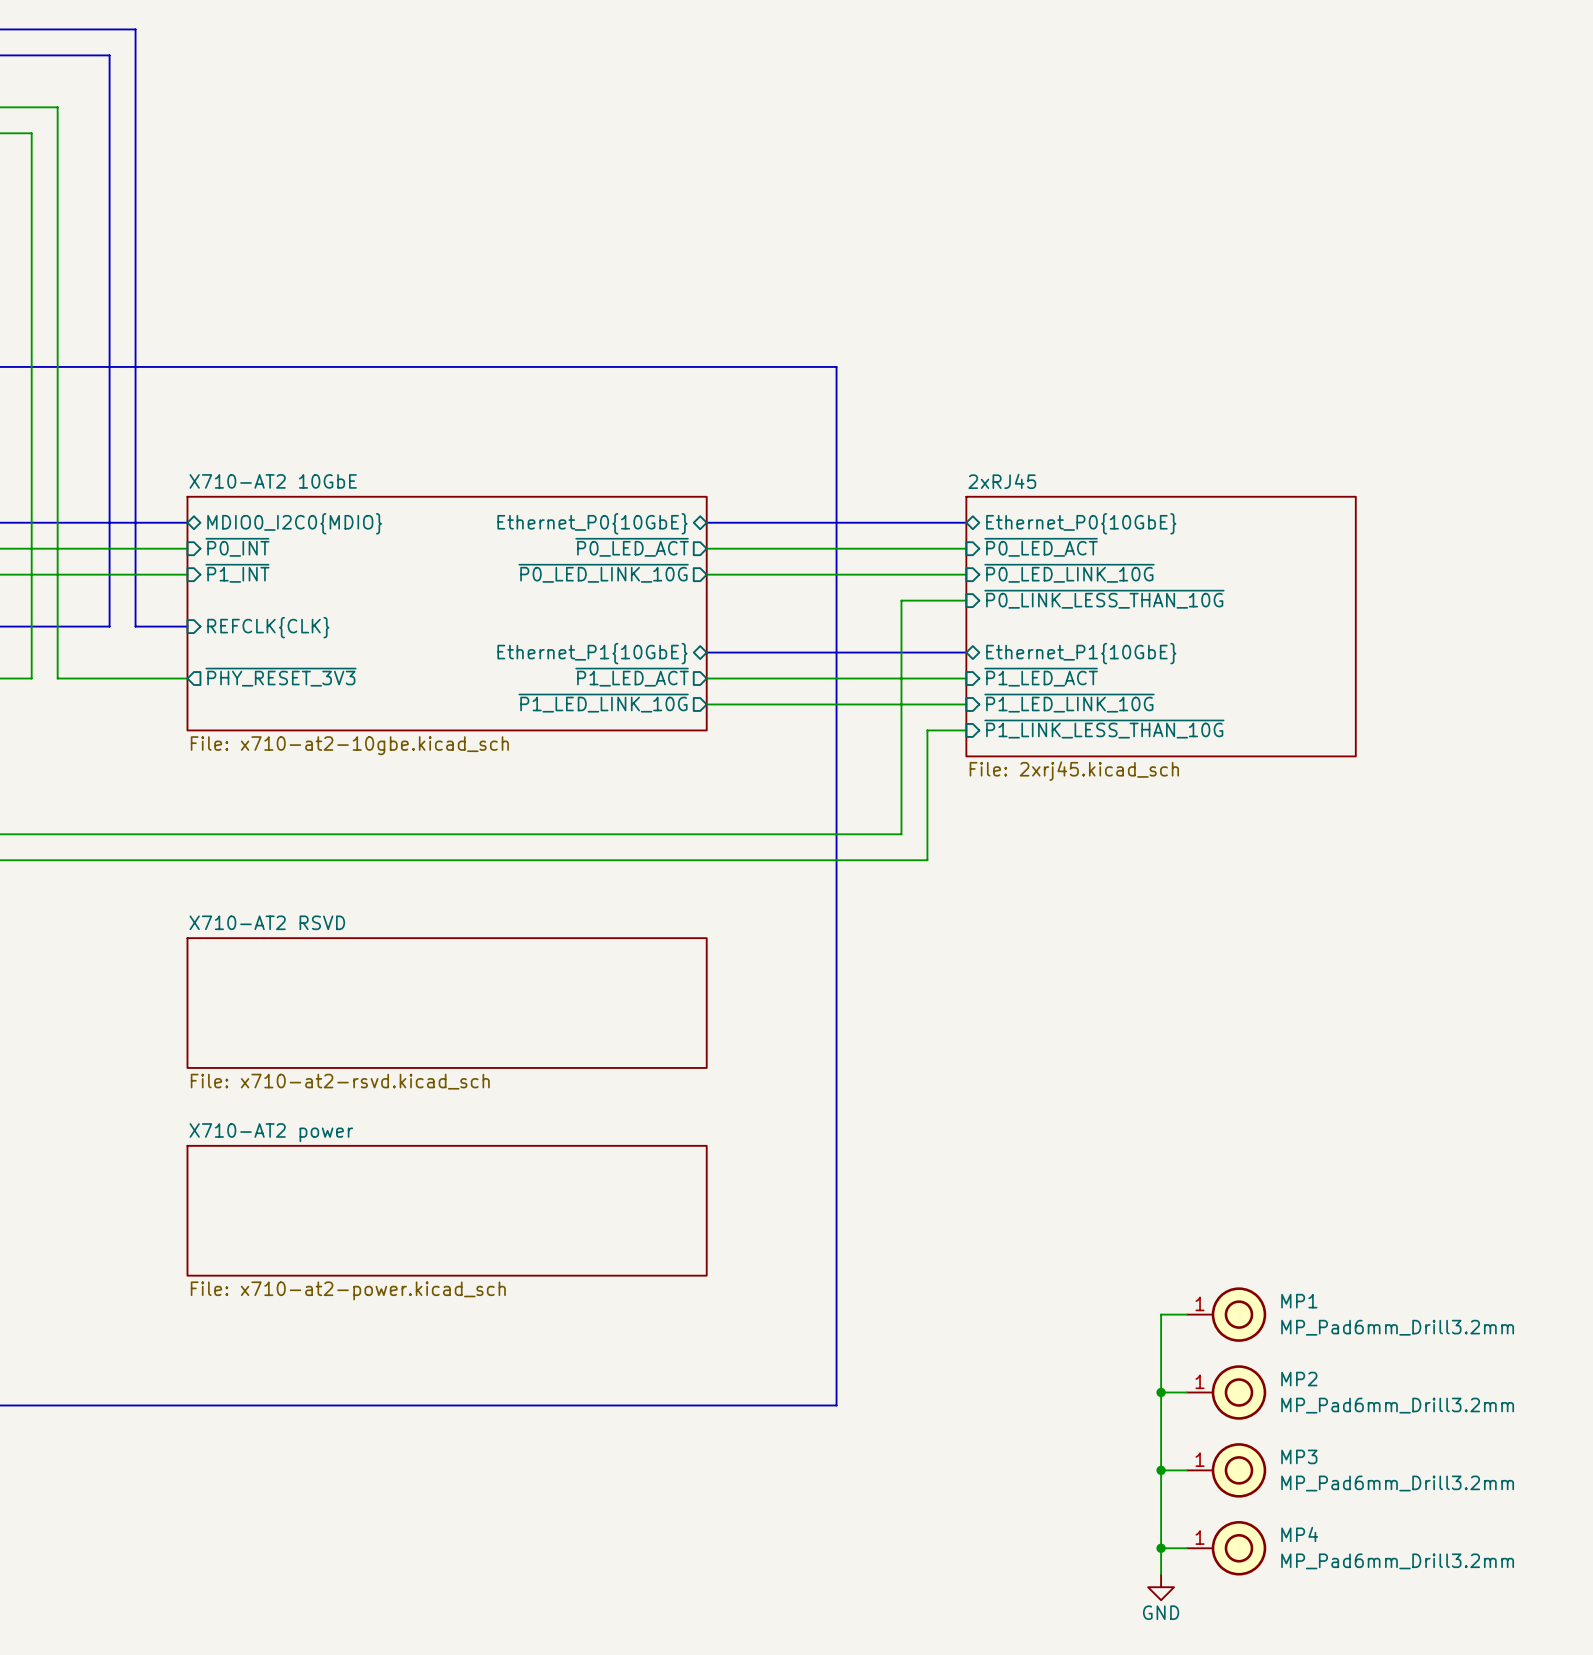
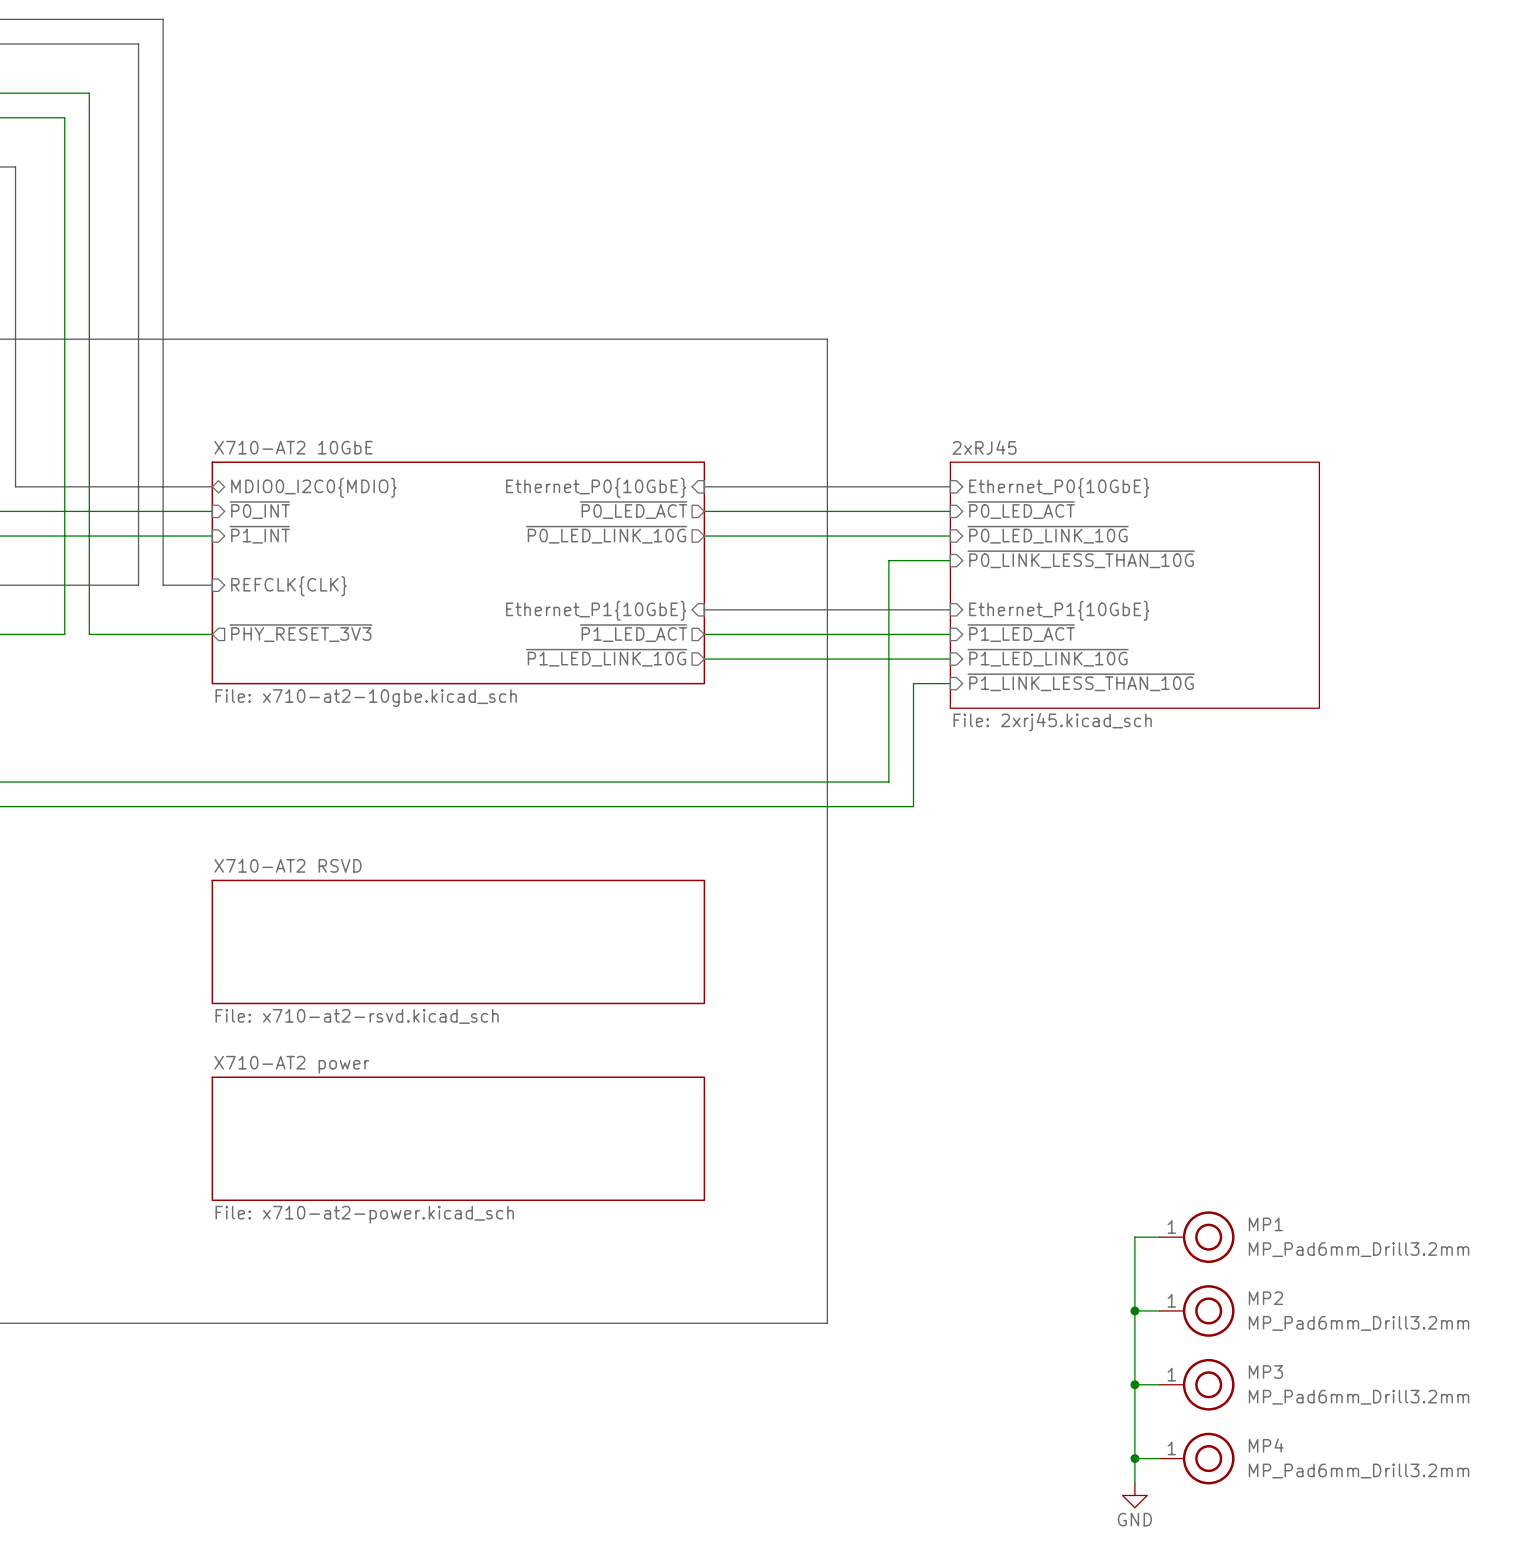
sheet pin shape: bidirectional (592, 523) -> input (596, 487)
sheet pin shape: bidirectional (1081, 523) -> input (1059, 487)
sheet pin shape: bidirectional (592, 653) -> input (596, 610)
sheet pin shape: bidirectional (1081, 653) -> input (1059, 610)

